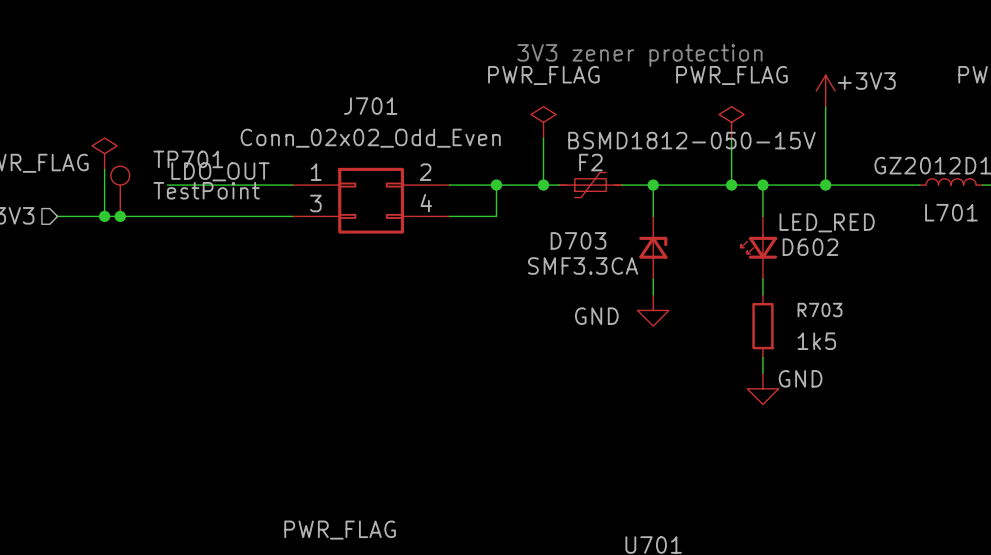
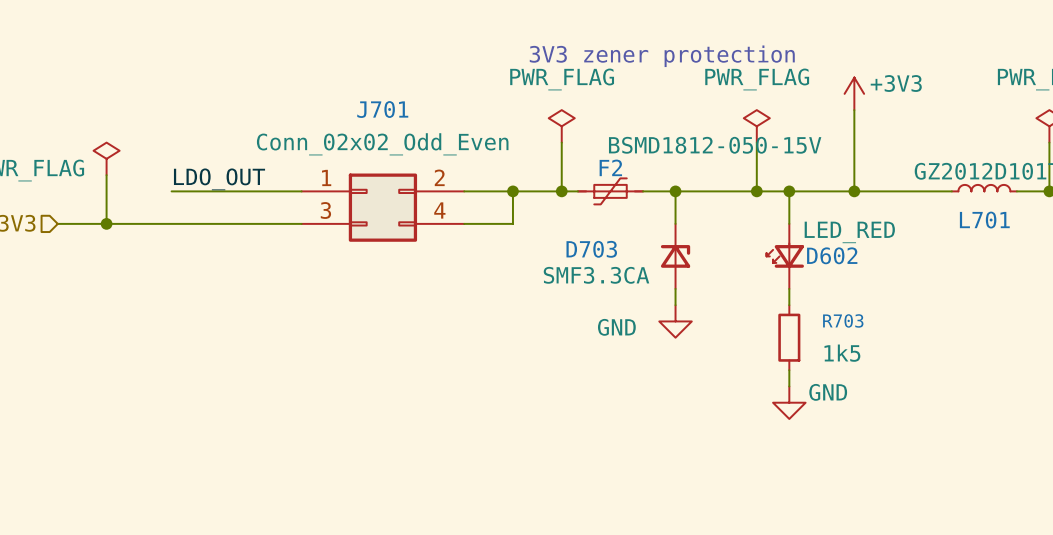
TP701: TestPoint (120, 191) -> none
junction: (120, 216) -> none

